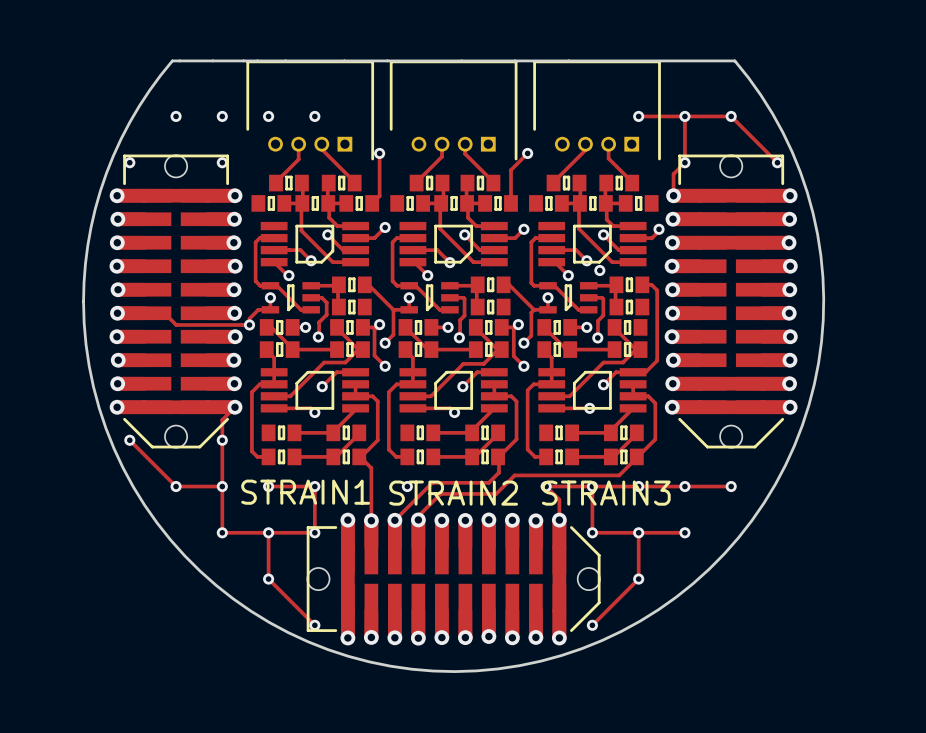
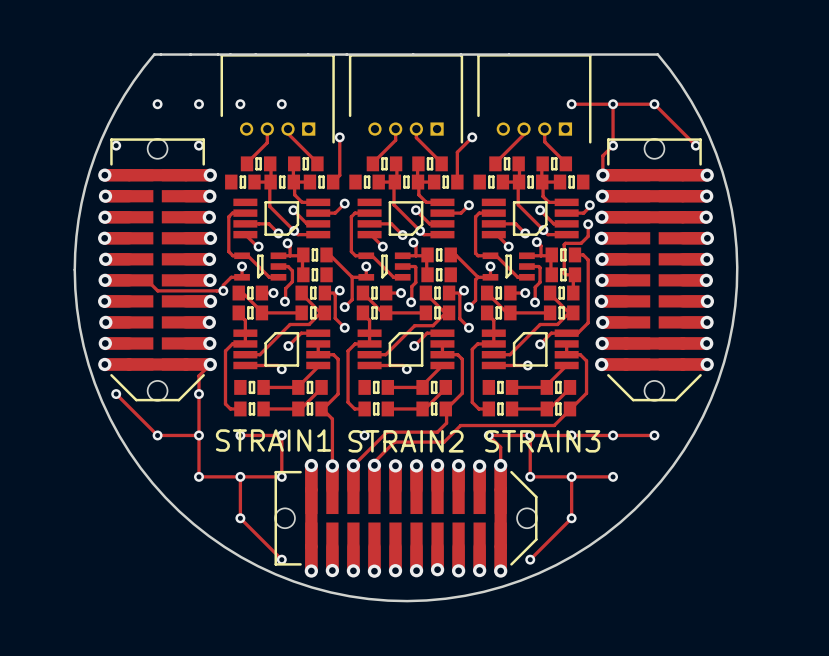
track: none -> (588, 224) (588, 236) (581, 243) (564, 244) (564, 273) (574, 274) (573, 293)
via: none -> (588, 224)
via: none -> (543, 230)
via: none -> (294, 230)
via: none -> (420, 230)
track: none -> (413, 242) (415, 245) (415, 255)
via: none -> (413, 242)
track: none -> (537, 242) (541, 245) (541, 255)
track: none -> (287, 243) (290, 245) (290, 255)
via: none -> (287, 243)

